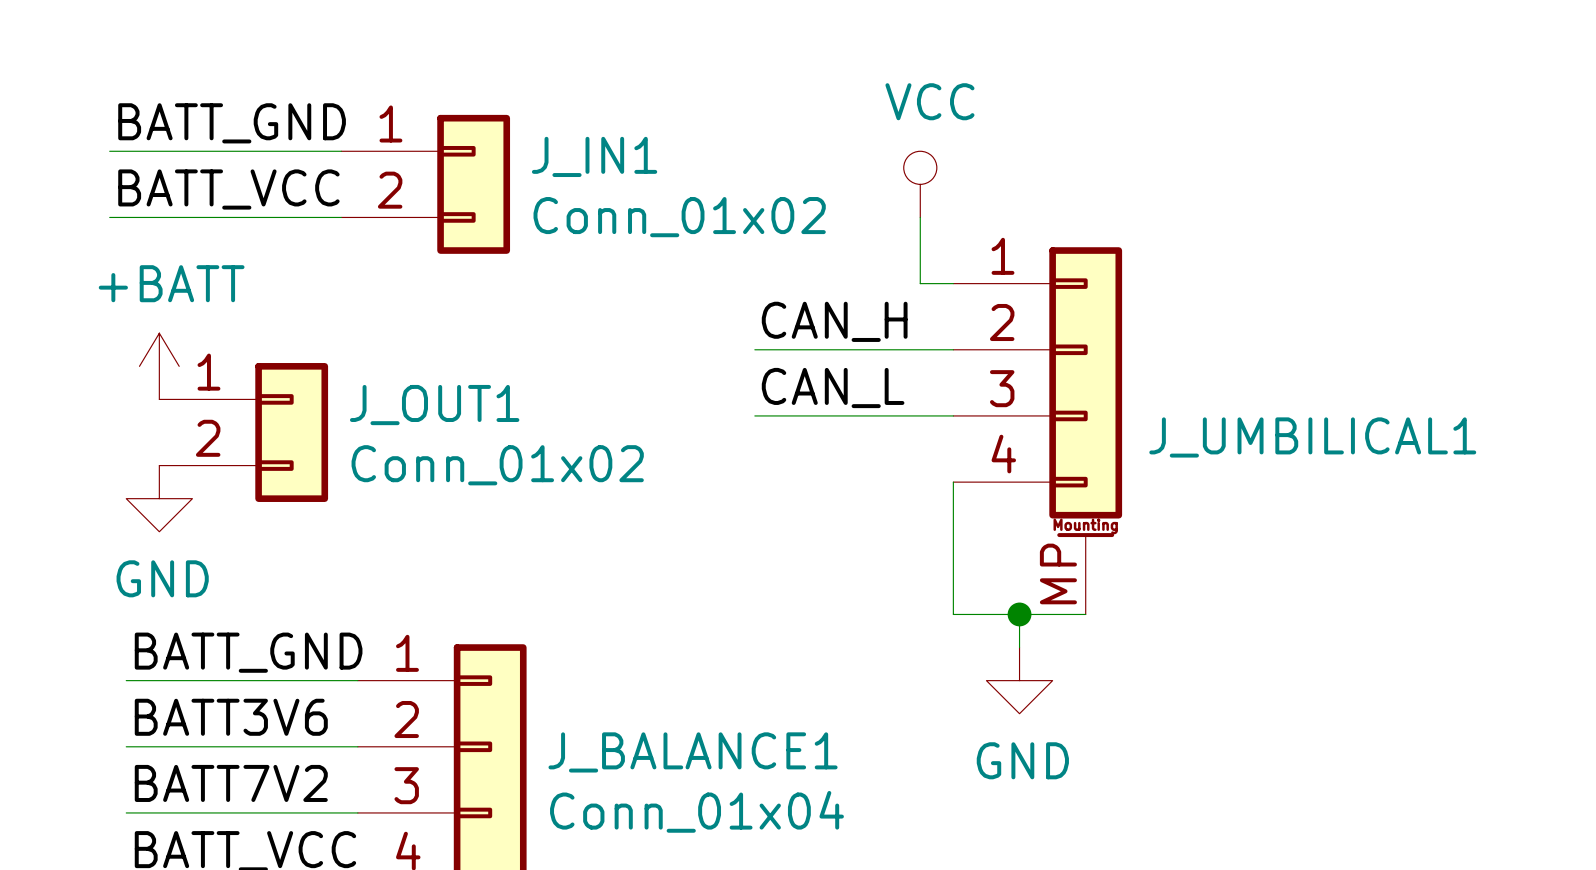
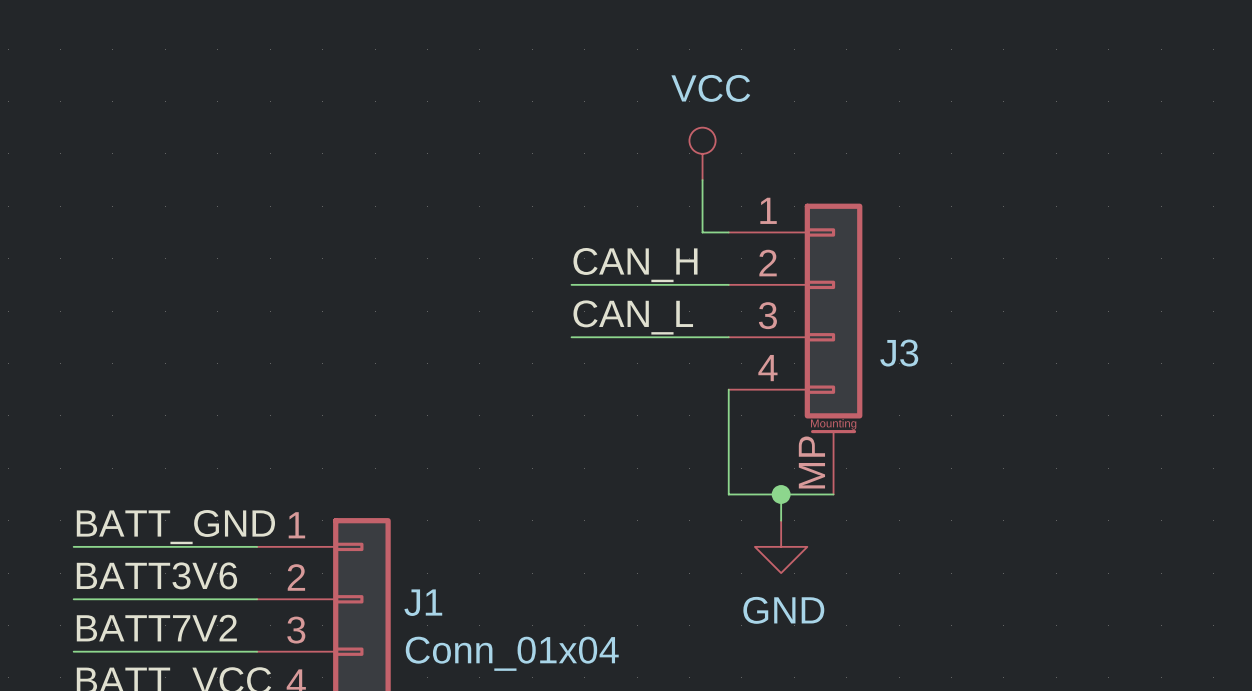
label: BATT_GND (232, 123) -> none
wire: (109, 151) (341, 151) -> none
J_IN1: Conn_01x02 (425, 184) -> none
label: BATT_VCC (228, 189) -> none
wire: (109, 217) (341, 217) -> none
power symbol: +BATT (159, 366) -> none
J_OUT1: Conn_01x02 (243, 432) -> none
J_UMBILICAL1 name: J_UMBILICAL1 (1312, 437) -> J3 (899, 353)
power symbol: GND (159, 498) -> none
J_BALANCE1 name: J_BALANCE1 (693, 752) -> J1 (423, 602)

